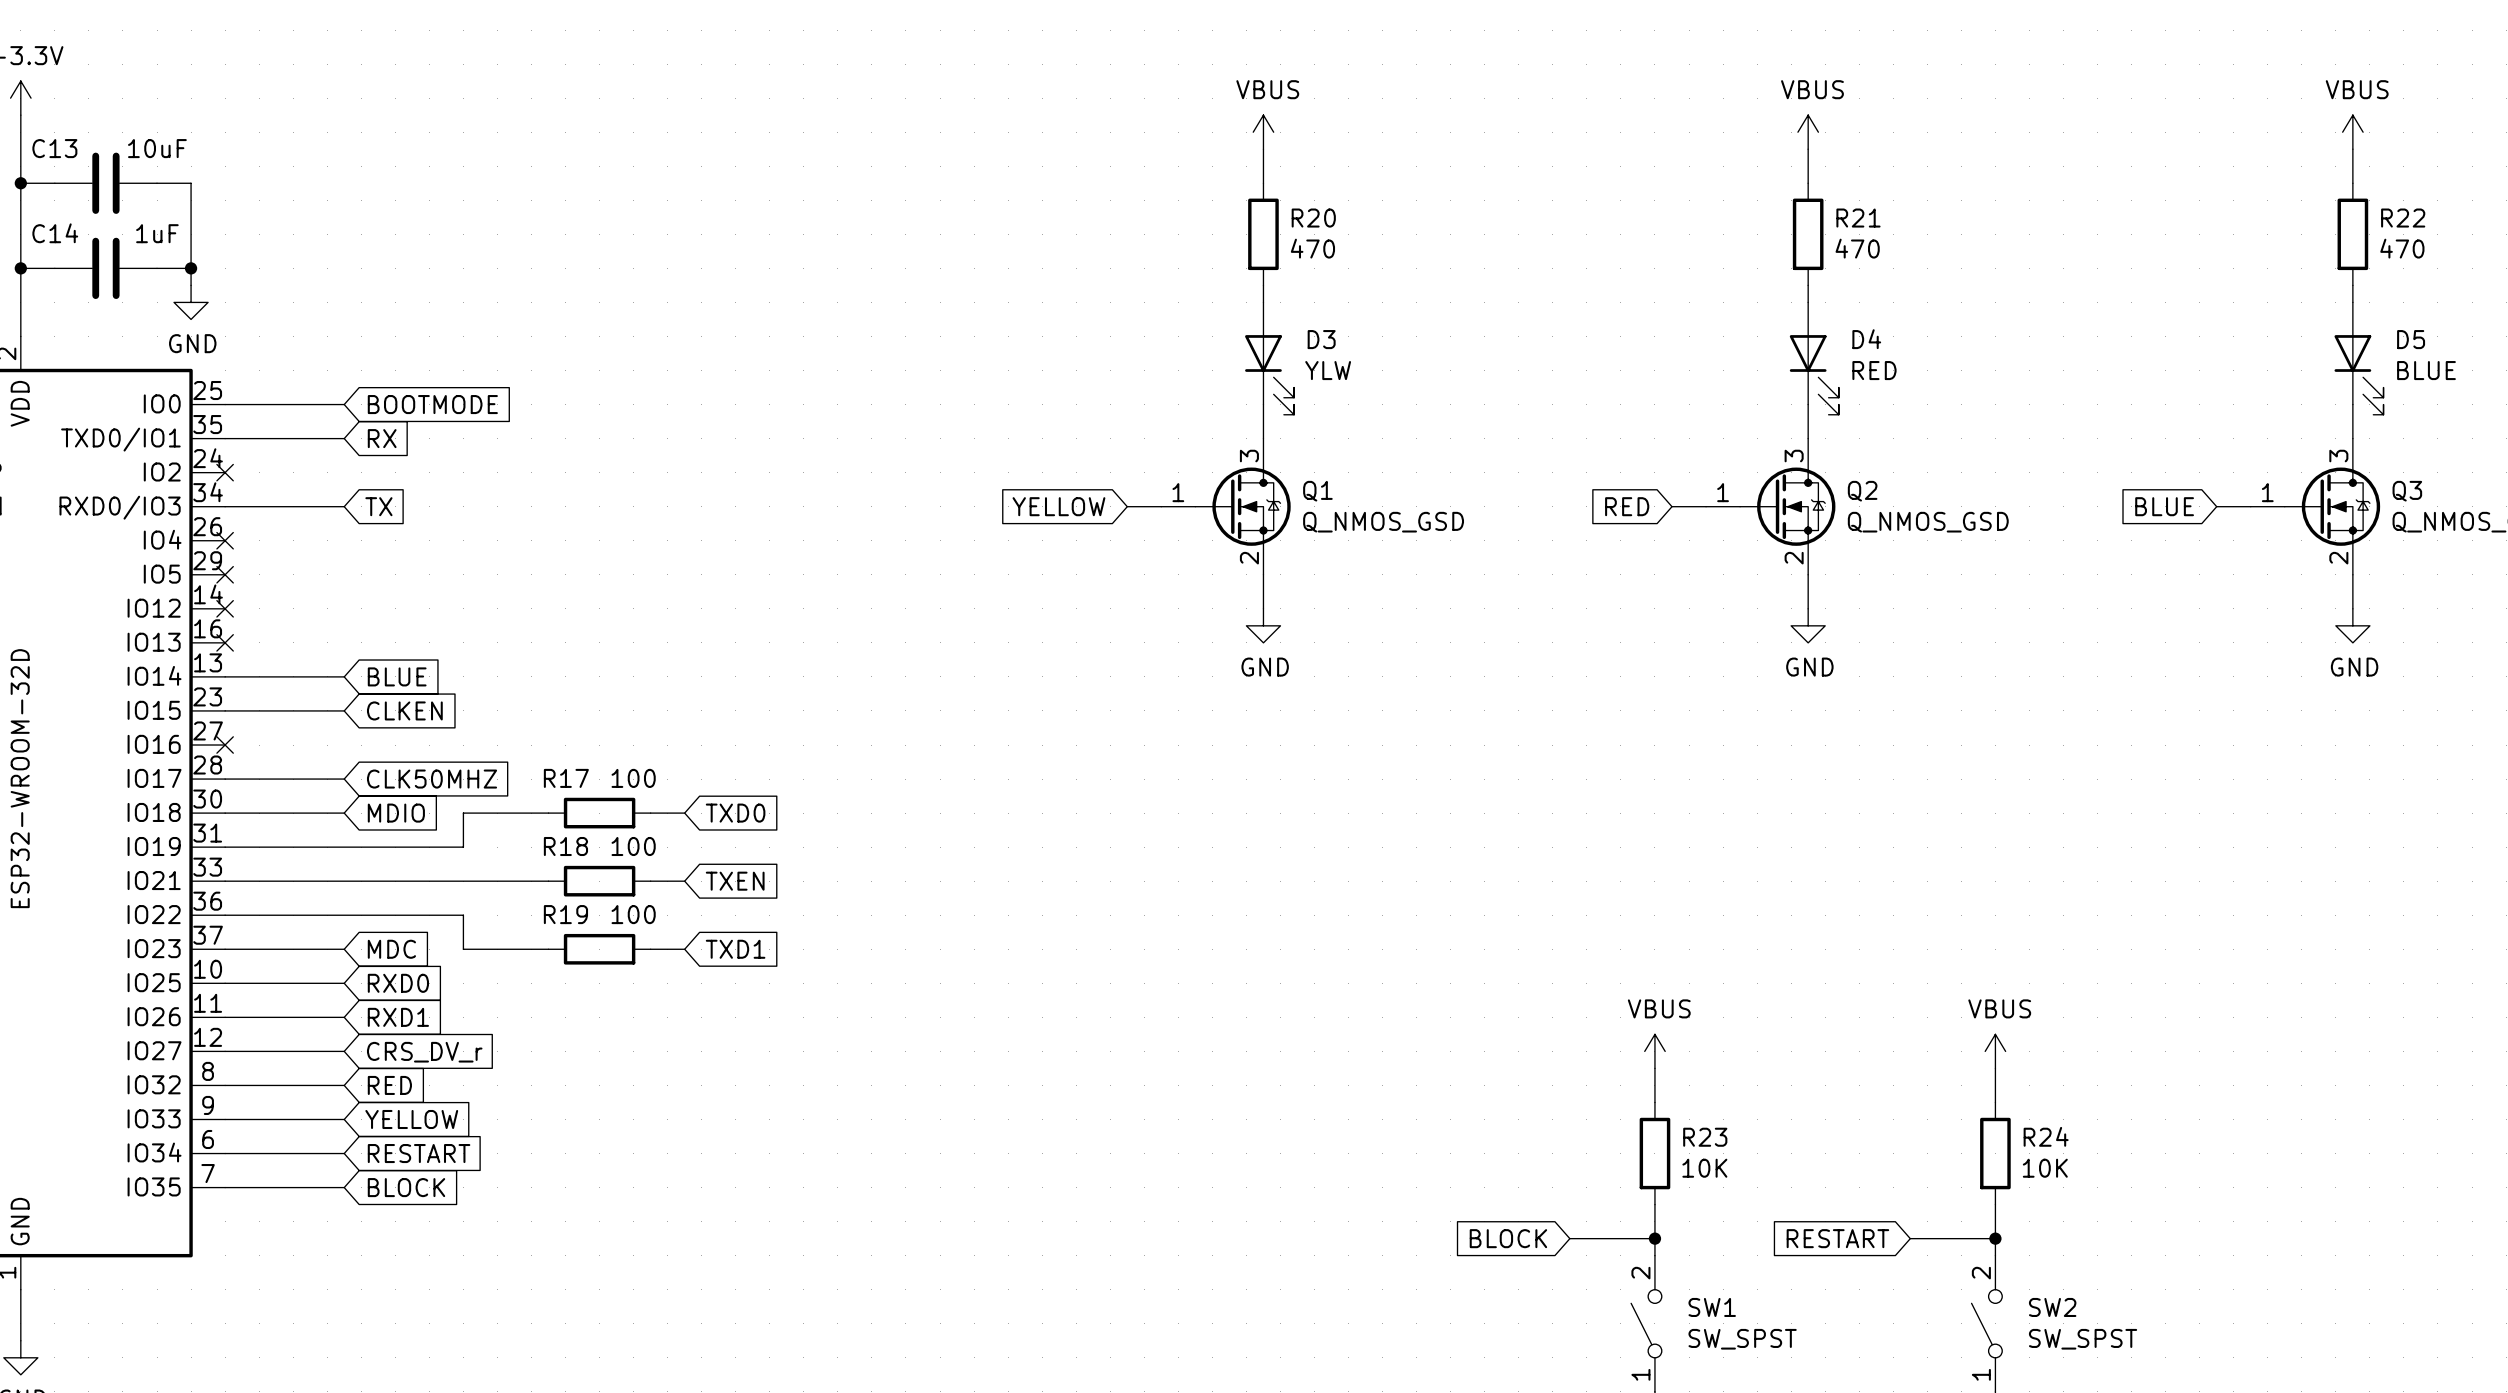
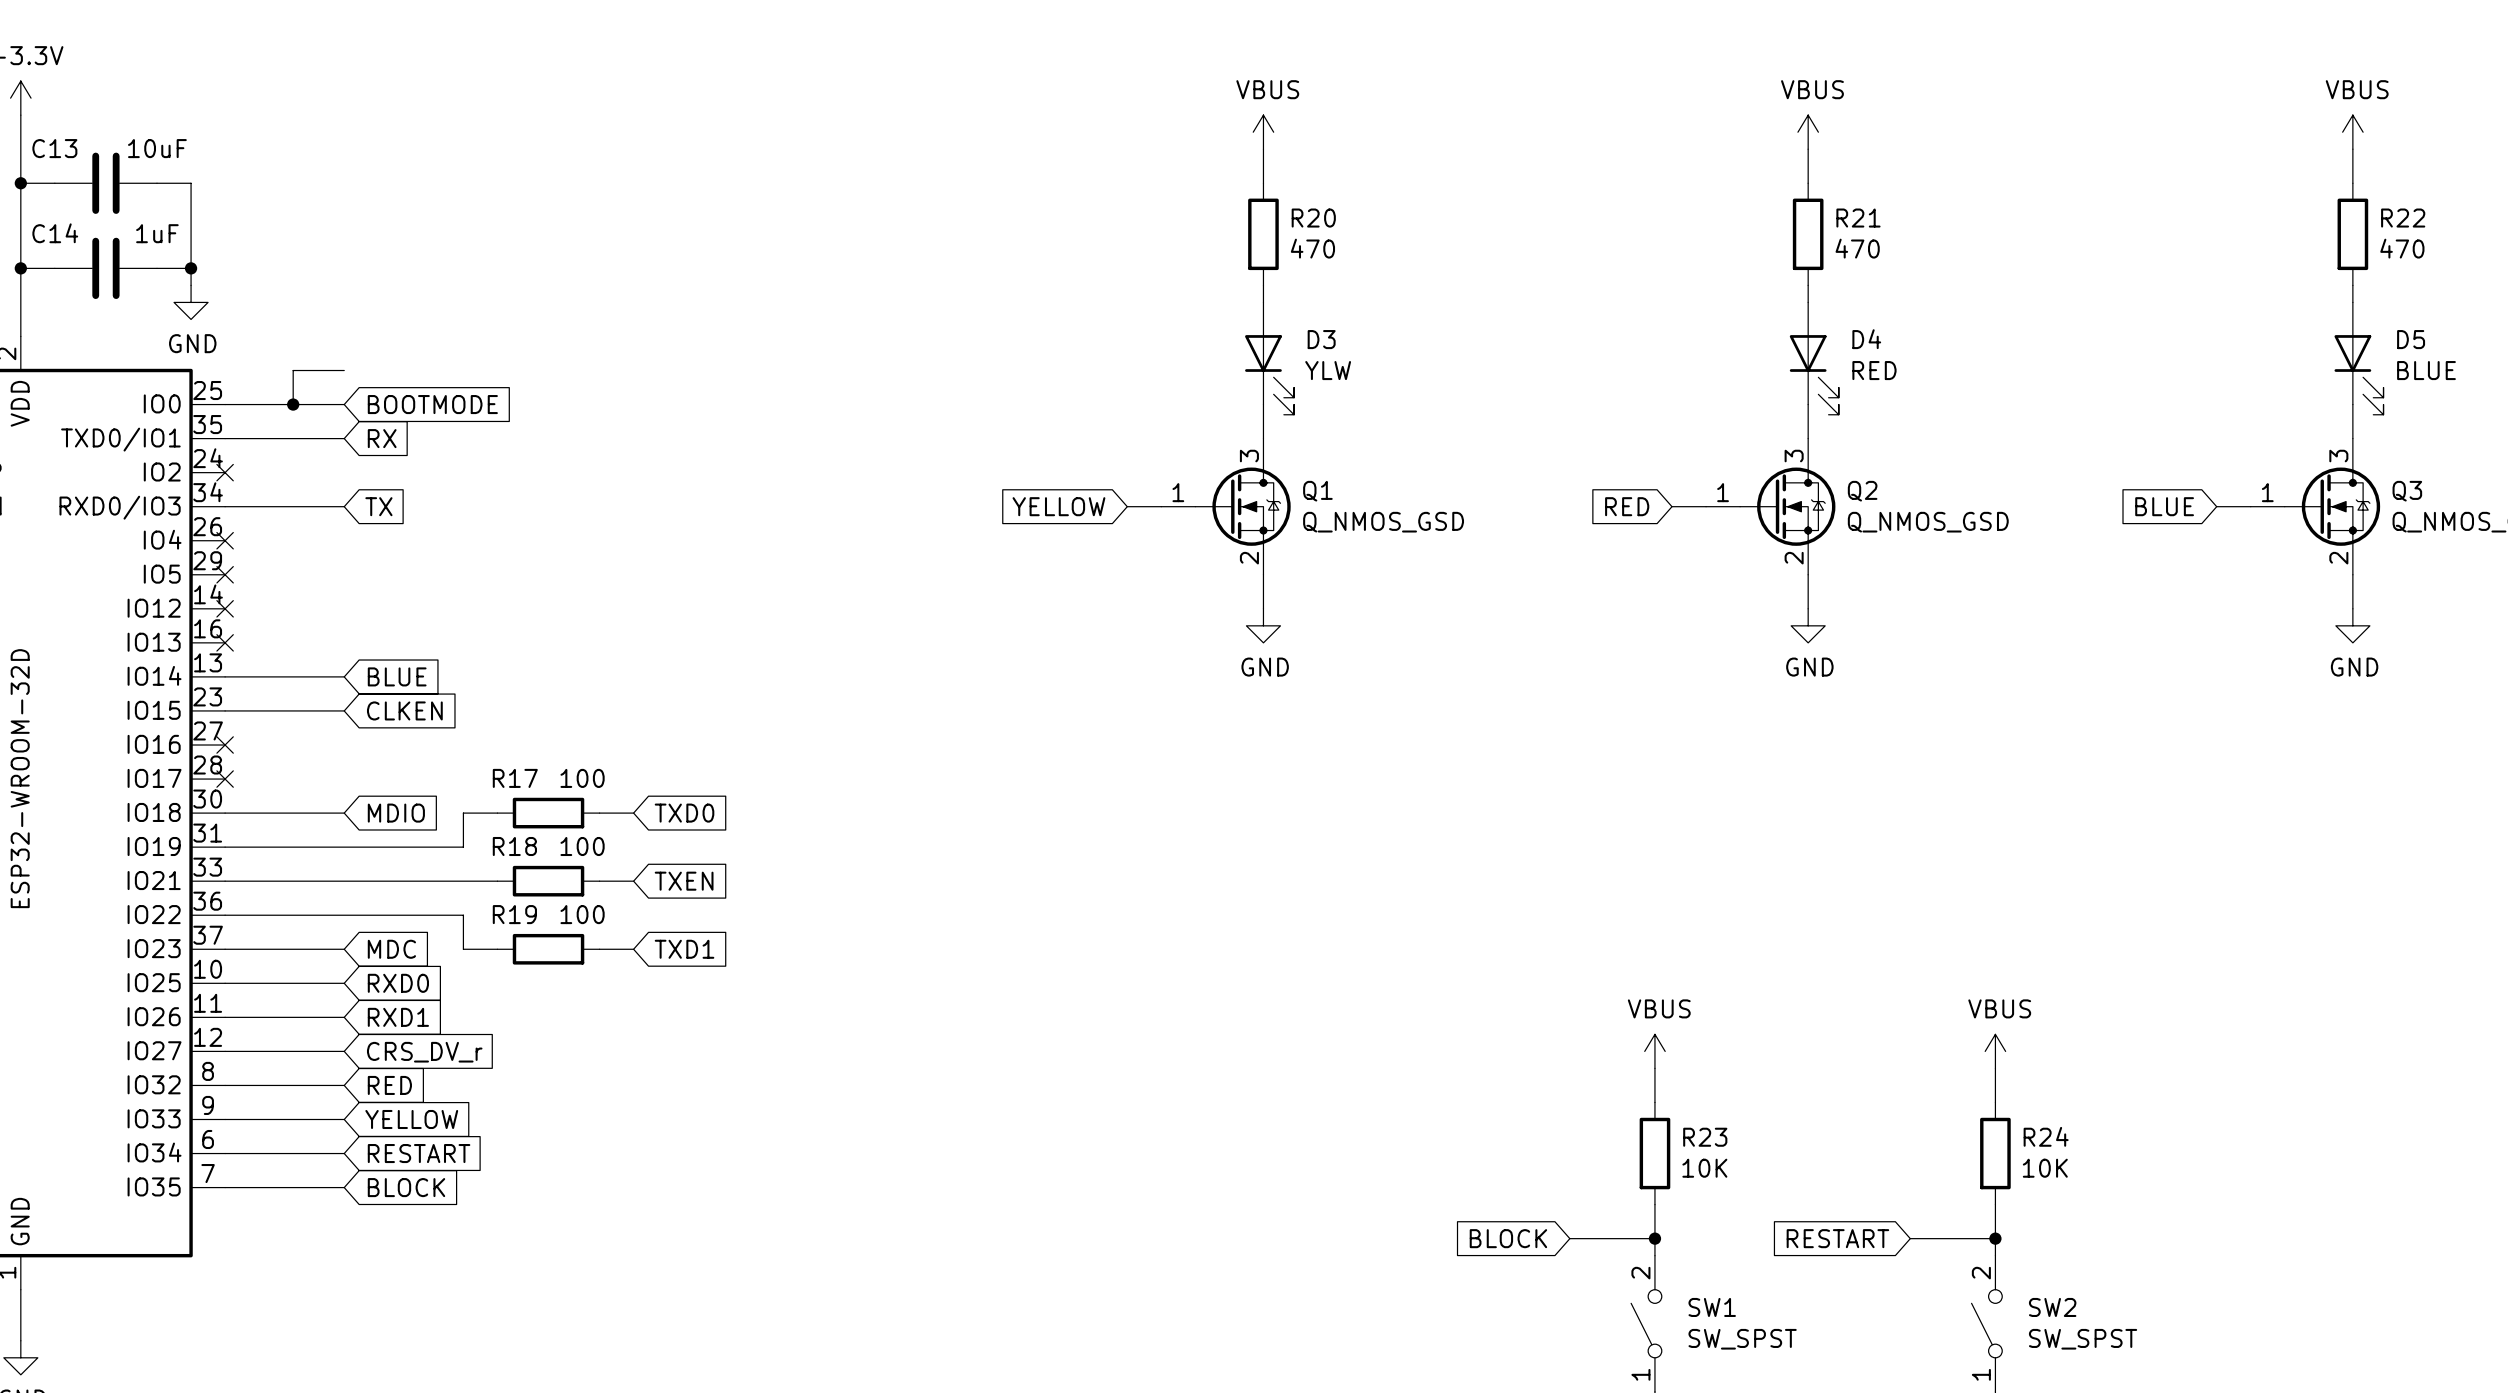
wire: none -> (344, 370) (293, 370) (293, 404)
junction: none -> (293, 404)
wire: (225, 779) (344, 779) -> none
no-connect mark: none -> (225, 779)
global label: CLK50MHZ (432, 779) -> none
wire: (497, 813) (548, 813) -> none
R17 position: (599, 813) -> (548, 813)
wire: (650, 813) (684, 813) -> (599, 813) (633, 813)
global label position: TXD0 (735, 813) -> TXD0 (684, 813)
wire: (497, 881) (548, 881) -> none
R18 position: (599, 881) -> (548, 881)
wire: (650, 881) (684, 881) -> (599, 881) (633, 881)
global label position: TXEN (735, 881) -> TXEN (684, 881)
wire: (497, 949) (548, 949) -> none
R19 position: (599, 949) -> (548, 949)
wire: (650, 949) (684, 949) -> (599, 949) (633, 949)
global label position: TXD1 (735, 949) -> TXD1 (684, 949)

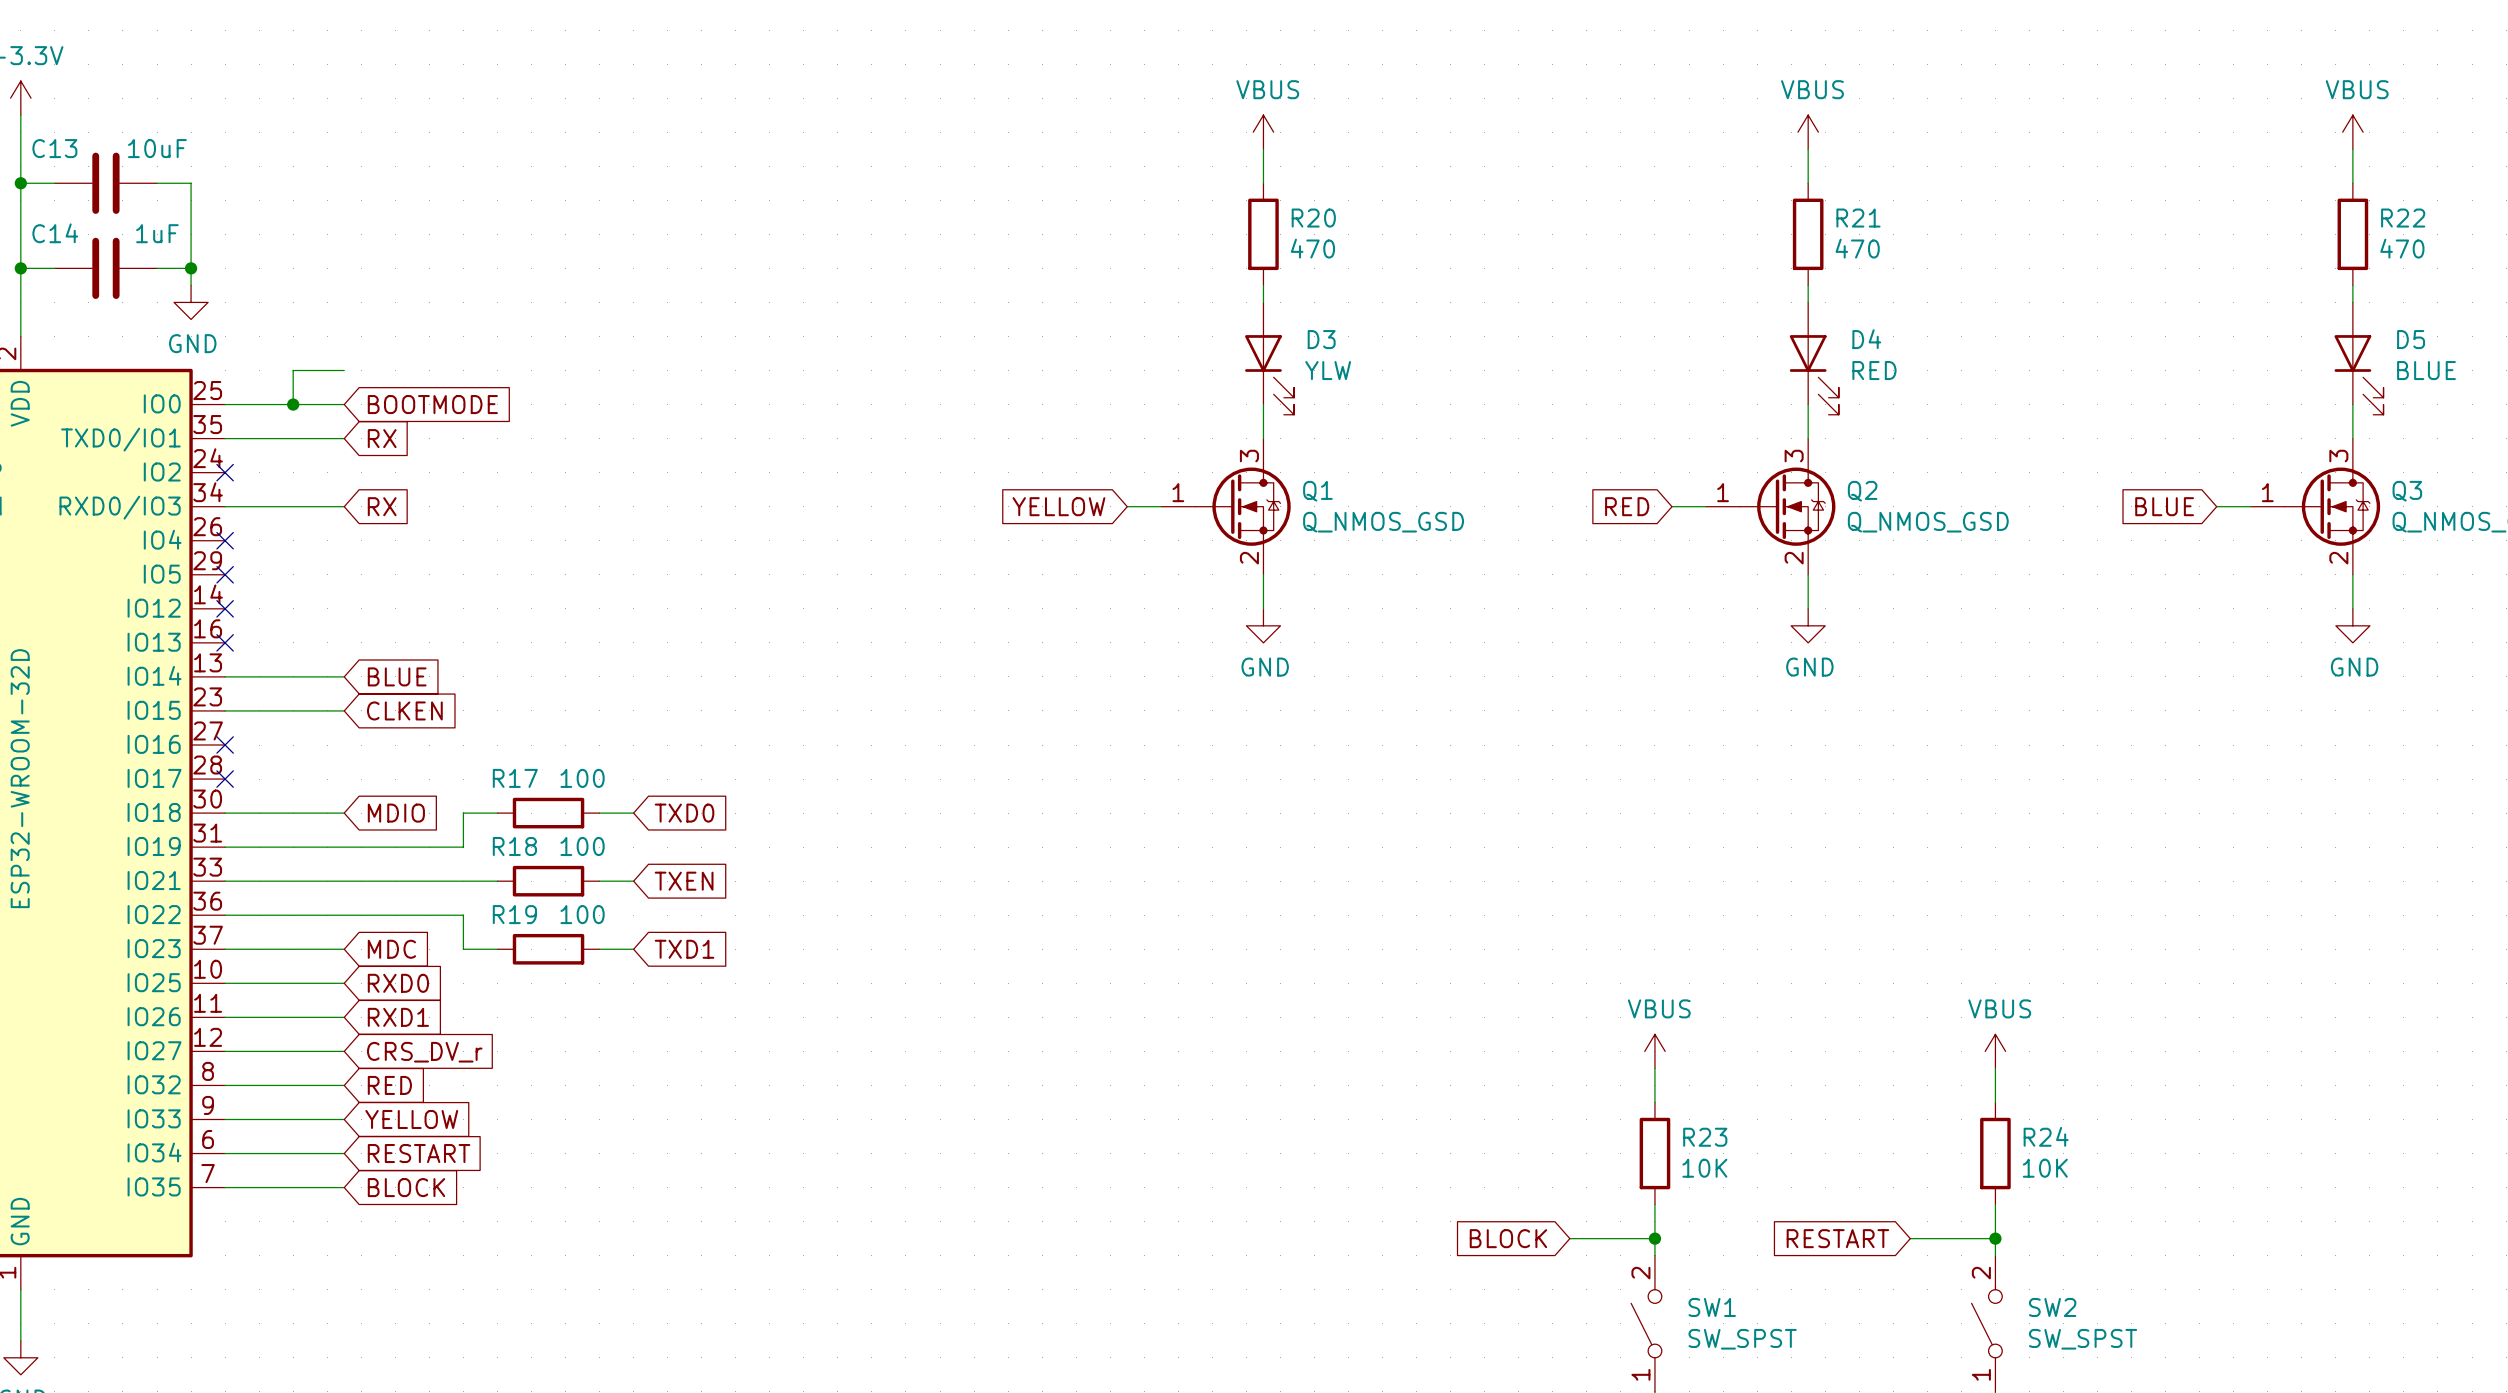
global label: TX (378, 506) -> RX (382, 506)

